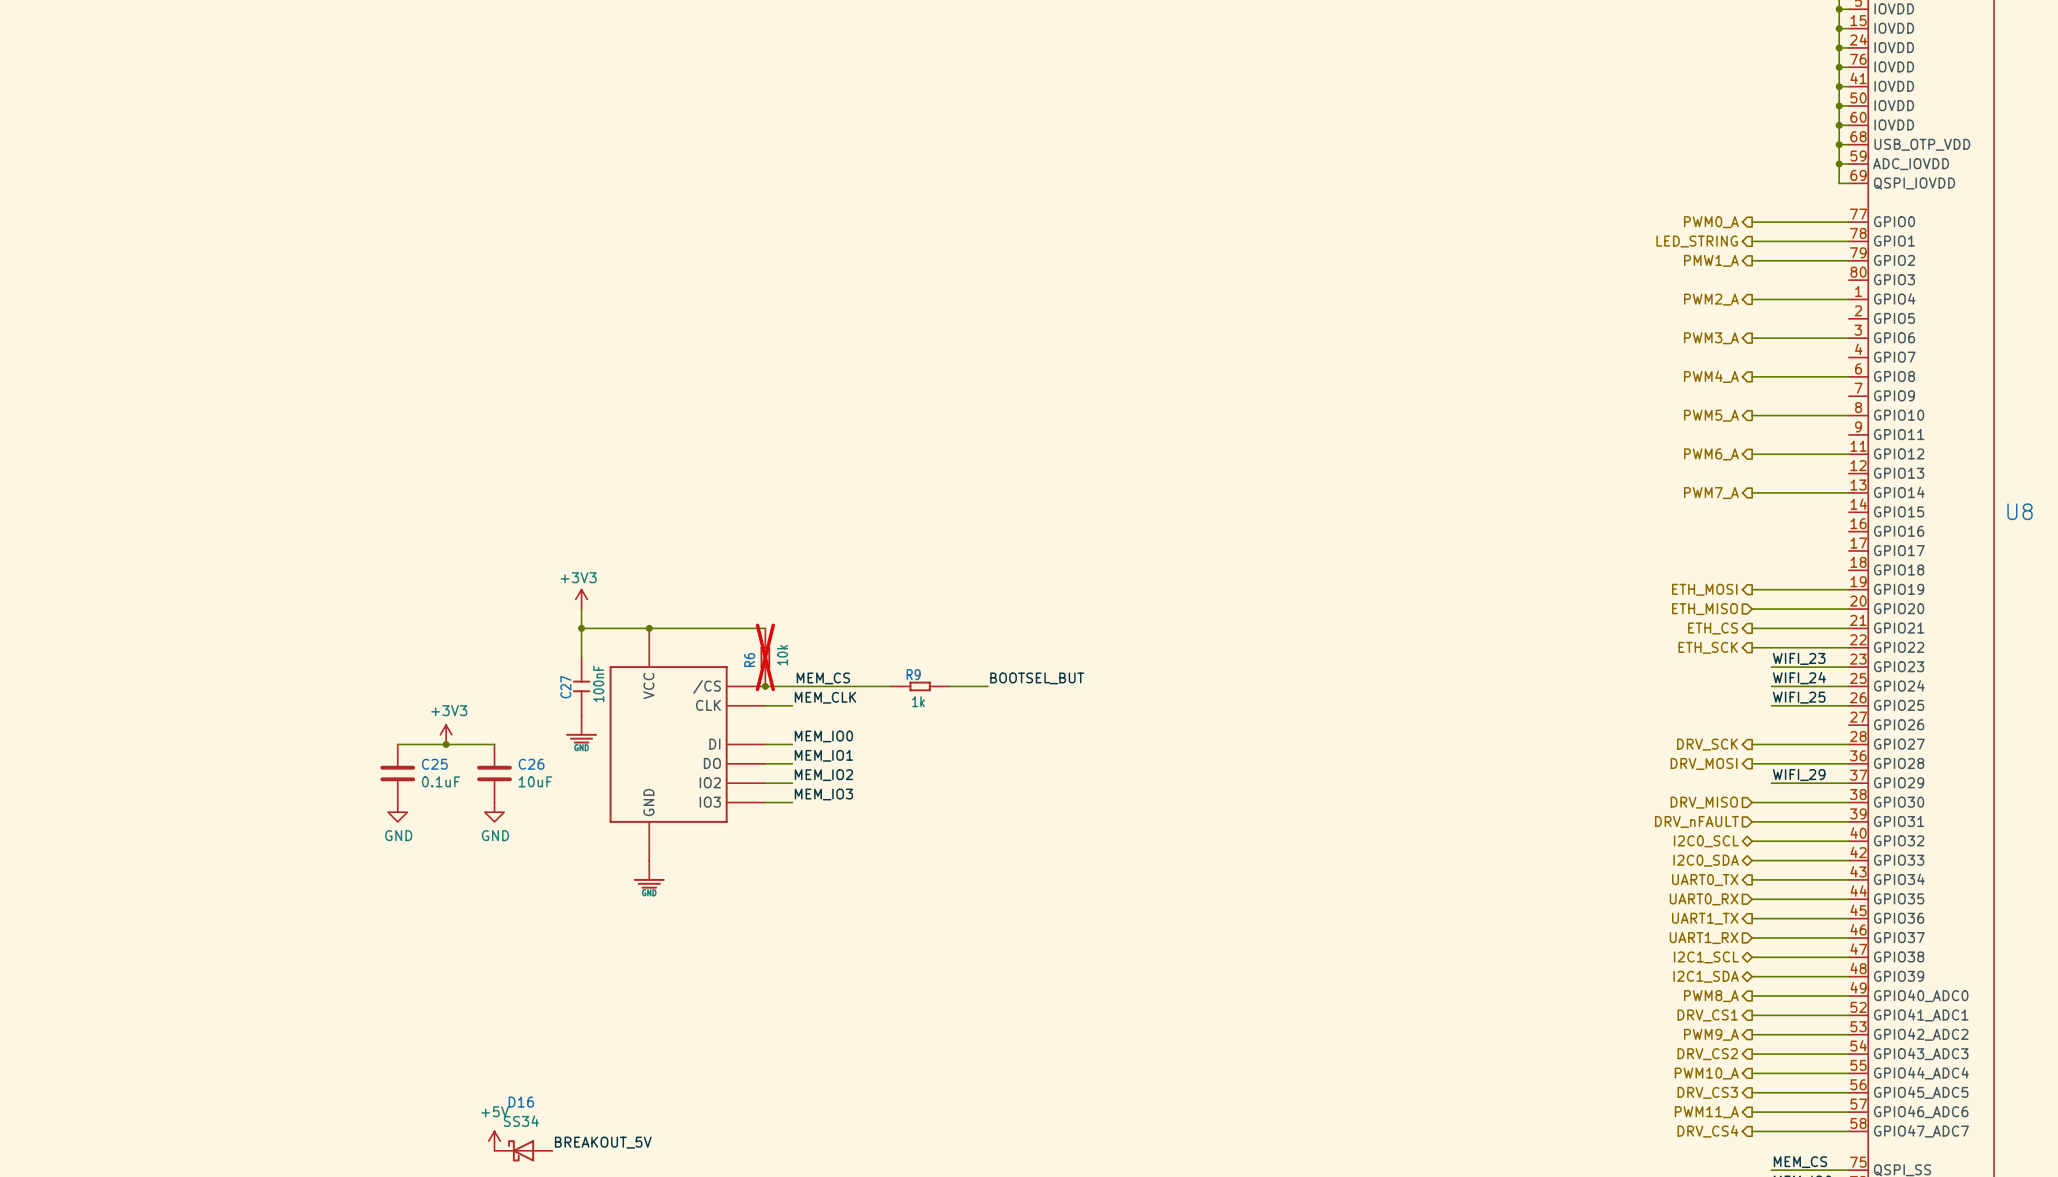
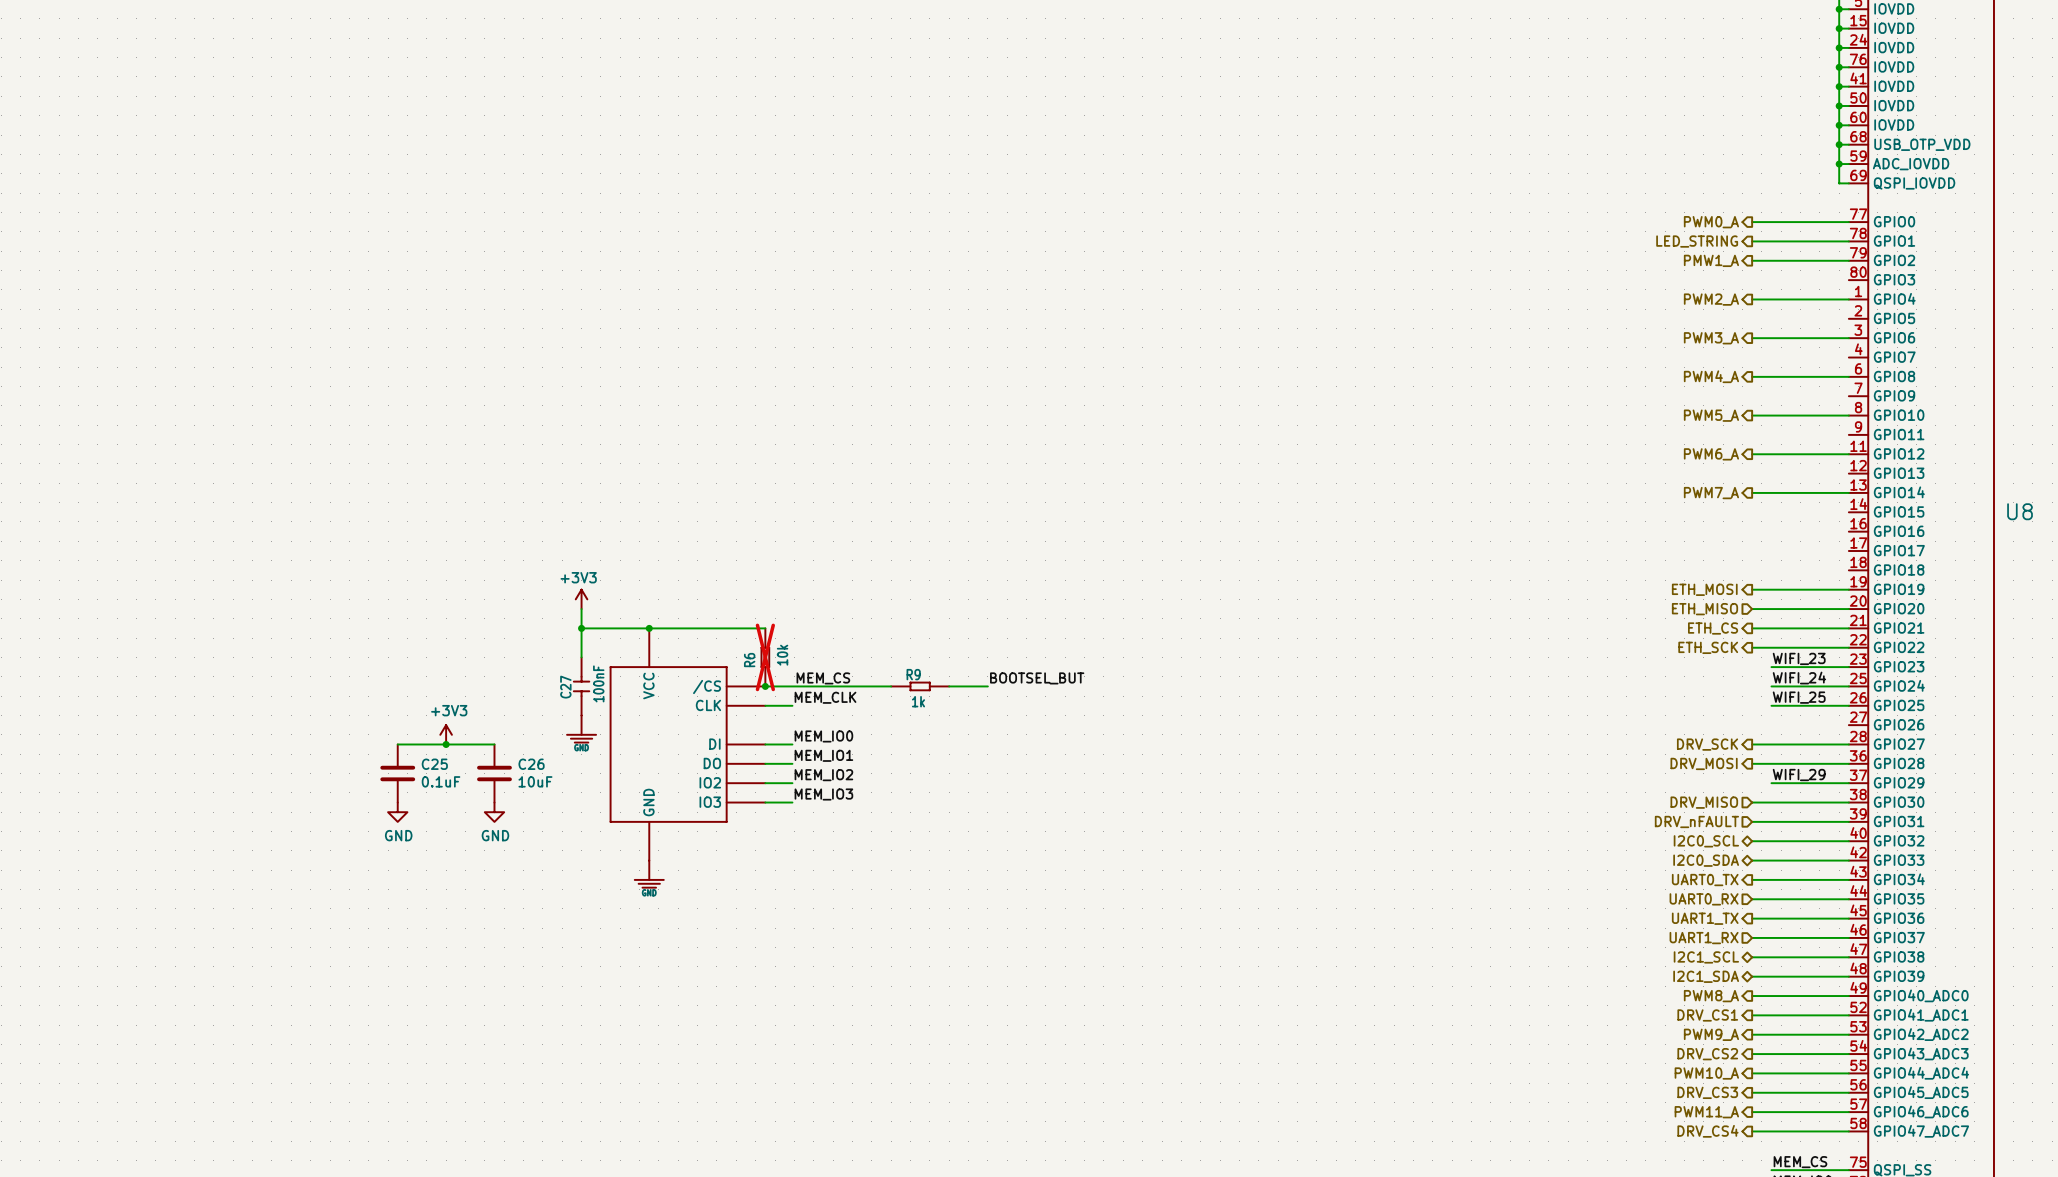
power symbol: +5V (494, 1141) -> none
label: BREAKOUT_5V (603, 1142) -> none
D16: SS34 (523, 1150) -> none

